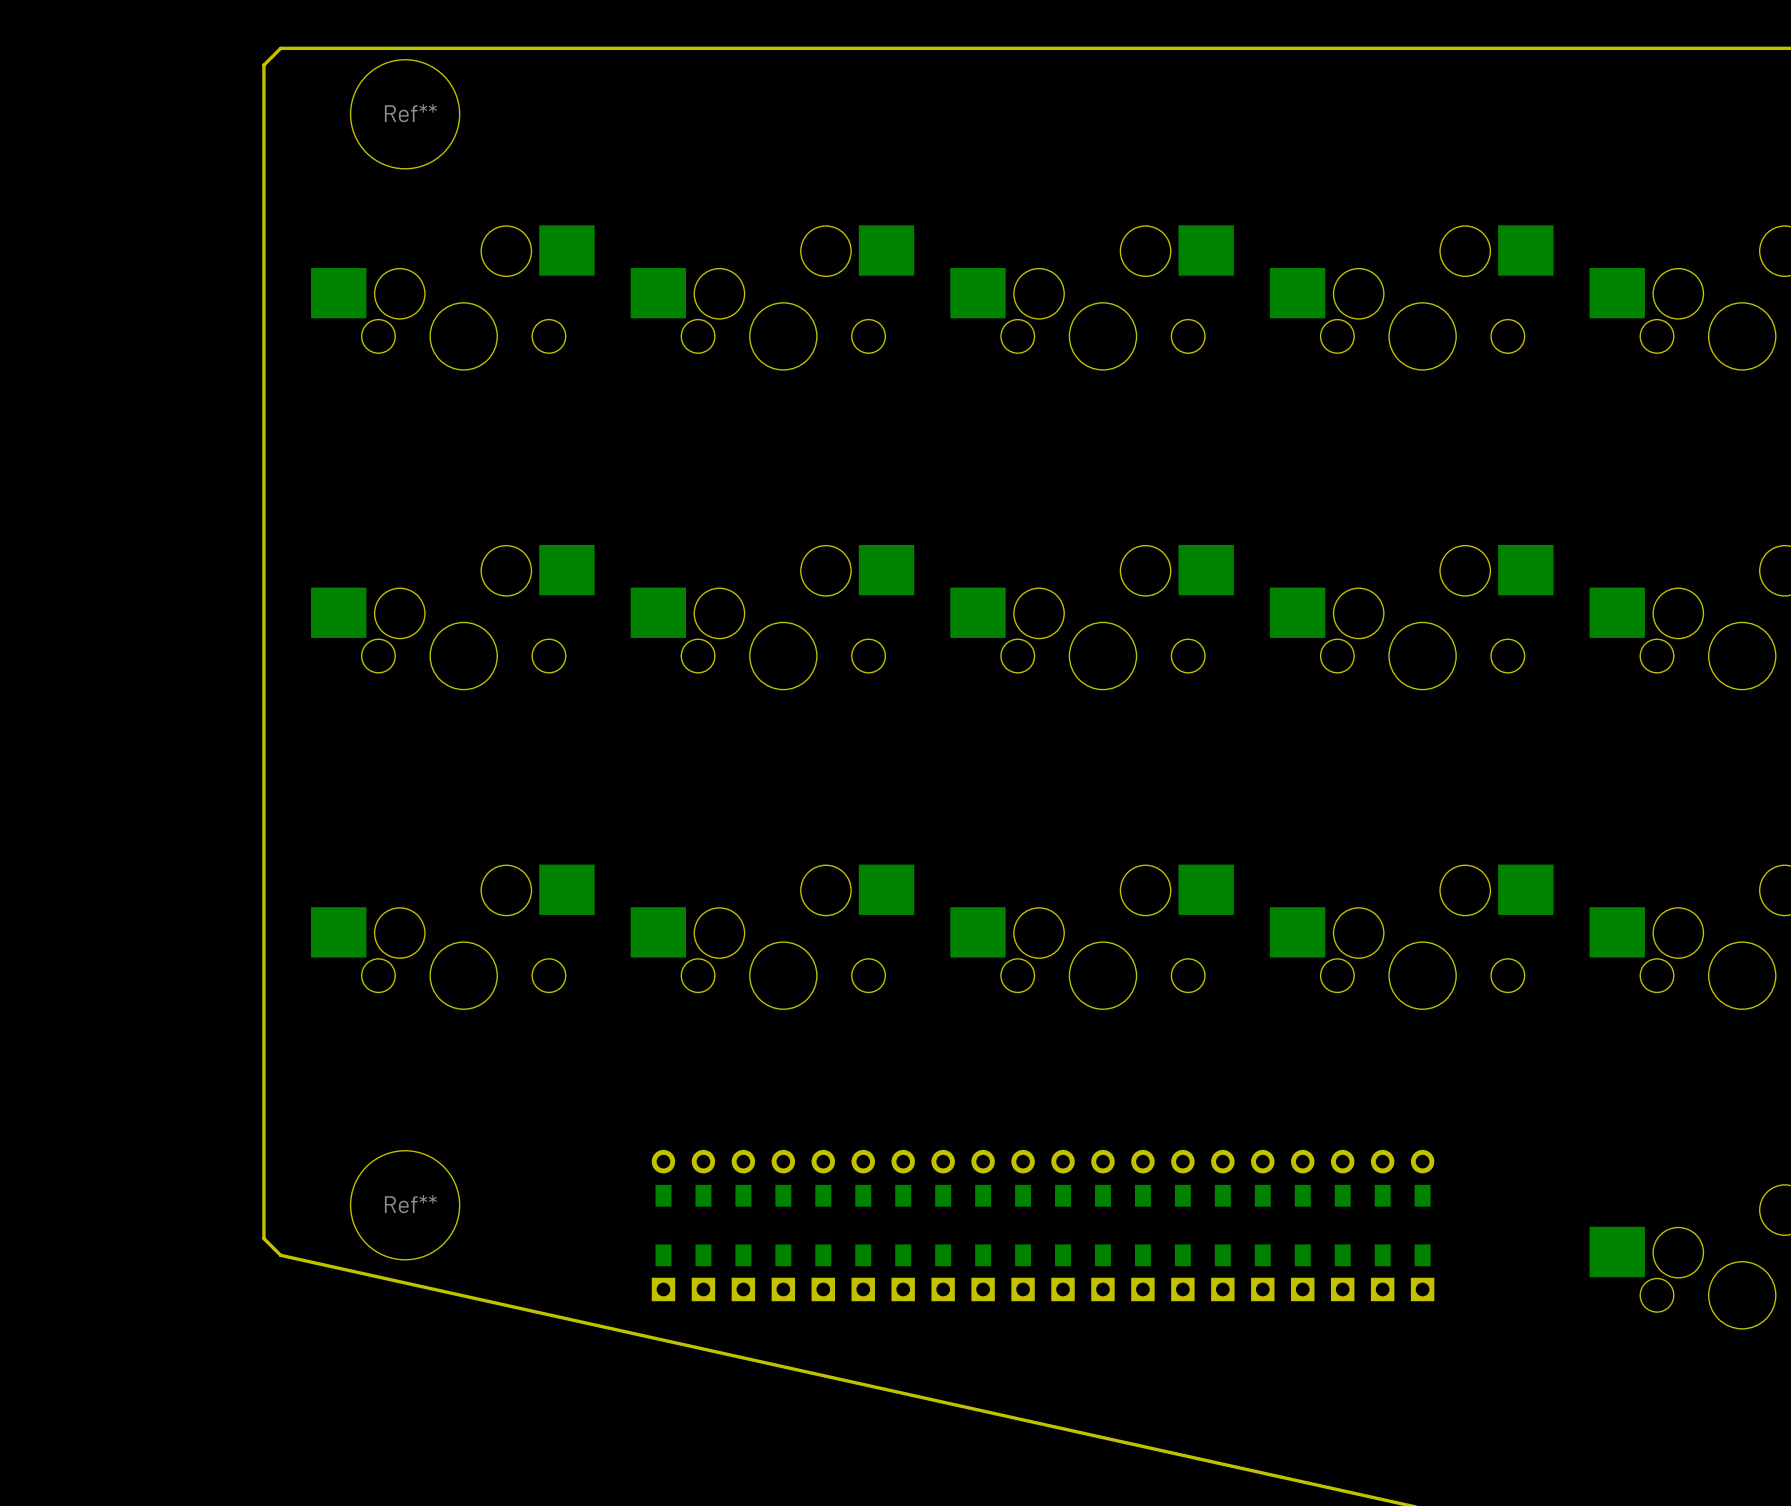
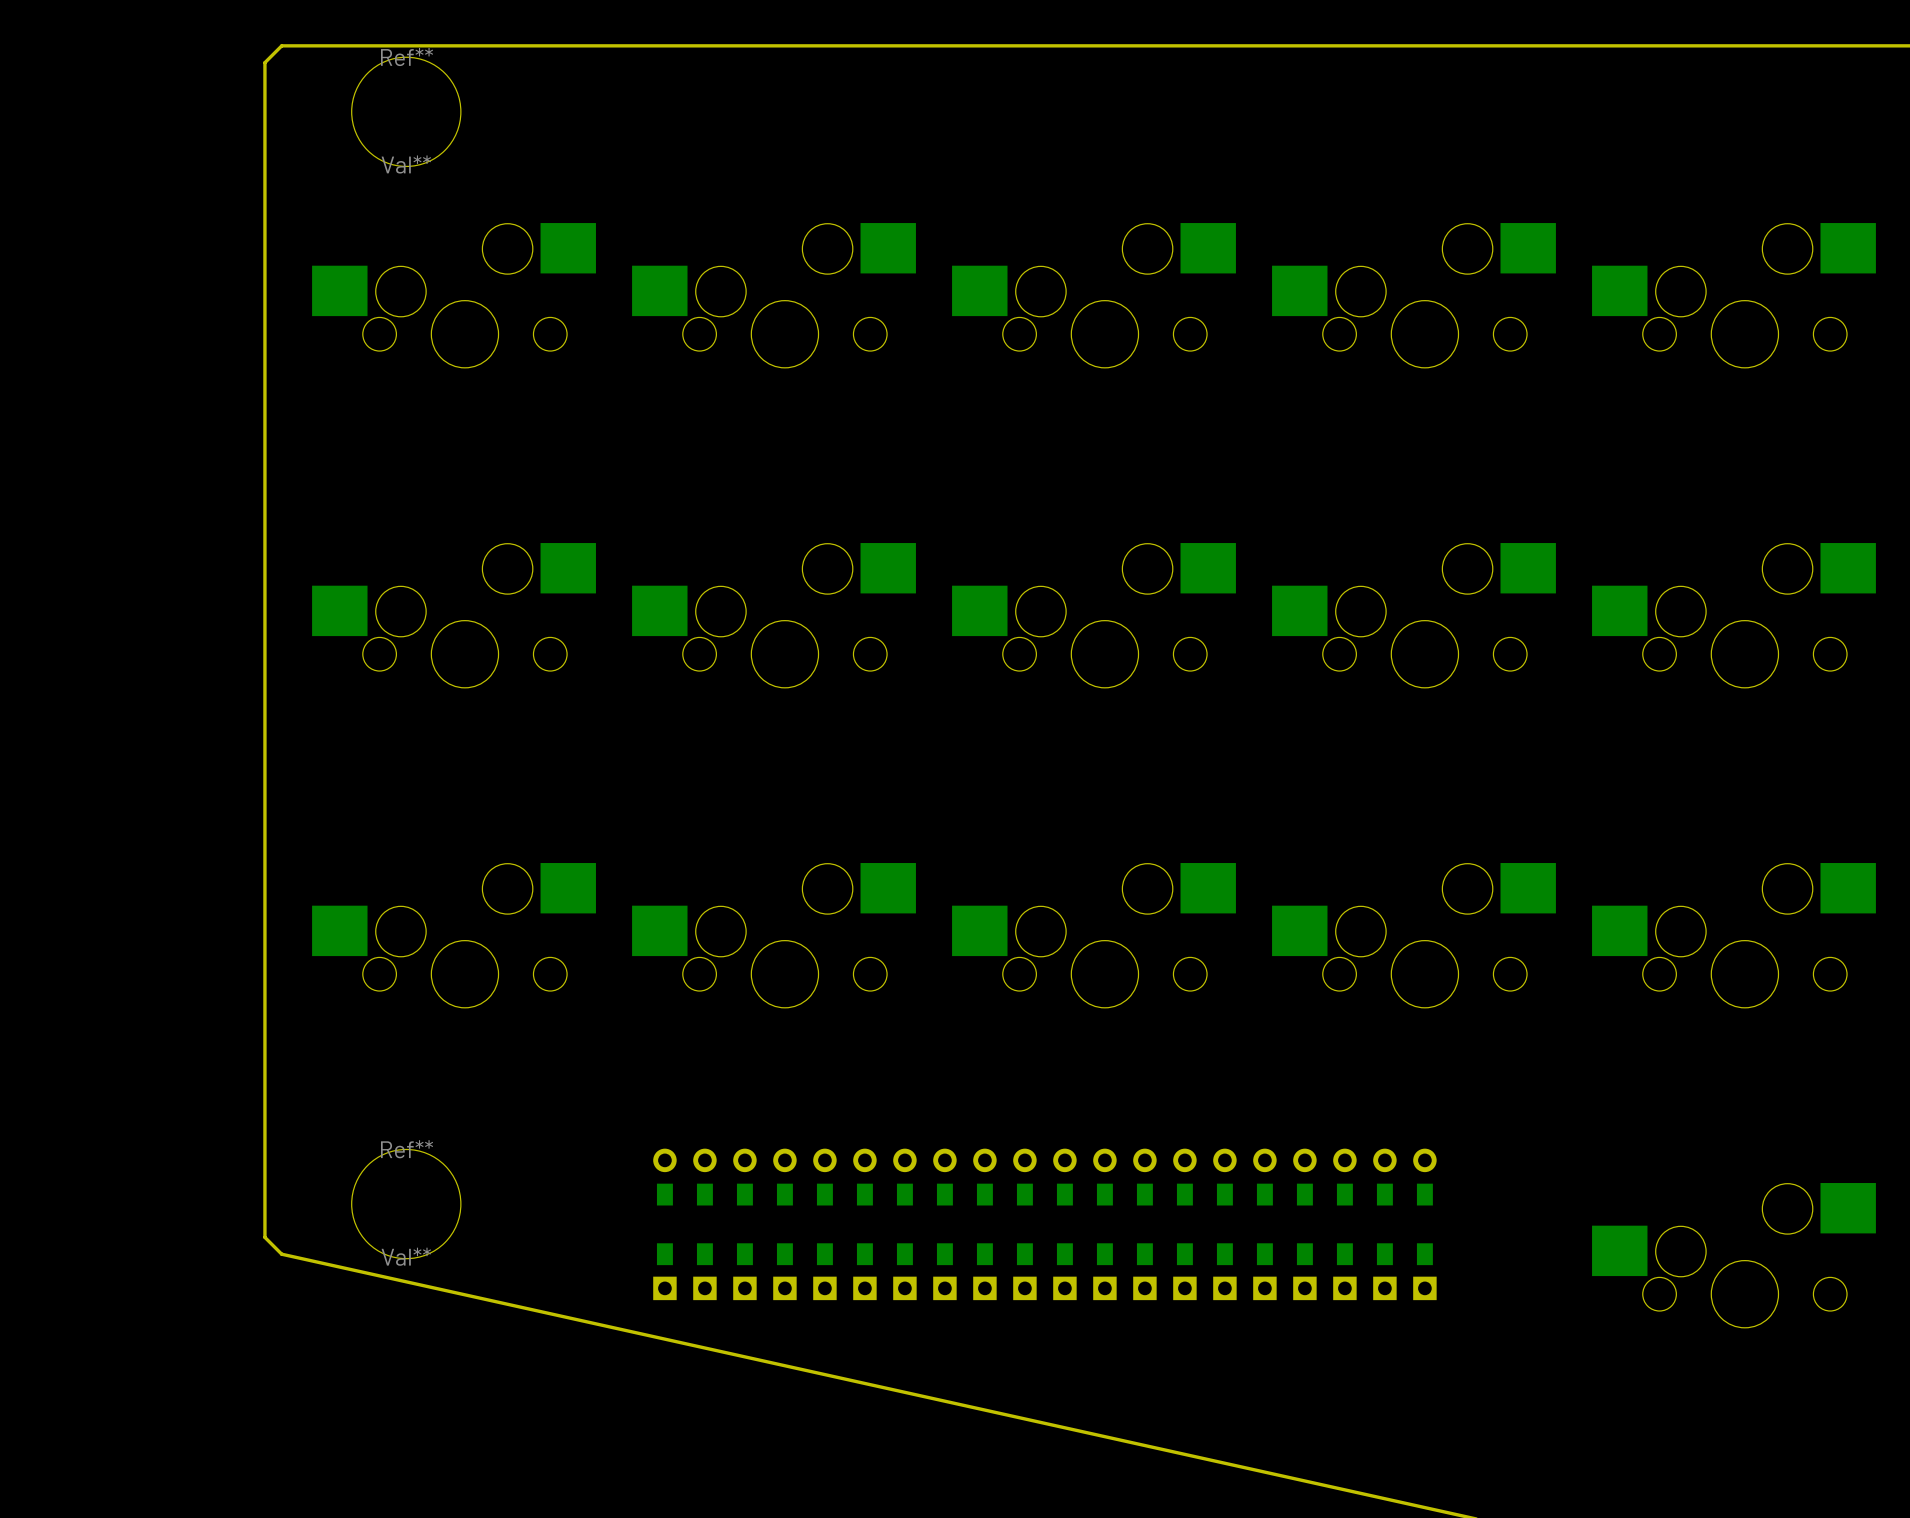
Ref** name position: Ref** (410, 113) -> Ref** (407, 57)
Ref** value: none -> Val** (406, 164)
Ref** name position: Ref** (410, 1204) -> Ref** (407, 1149)
Ref** value: none -> Val** (406, 1256)

